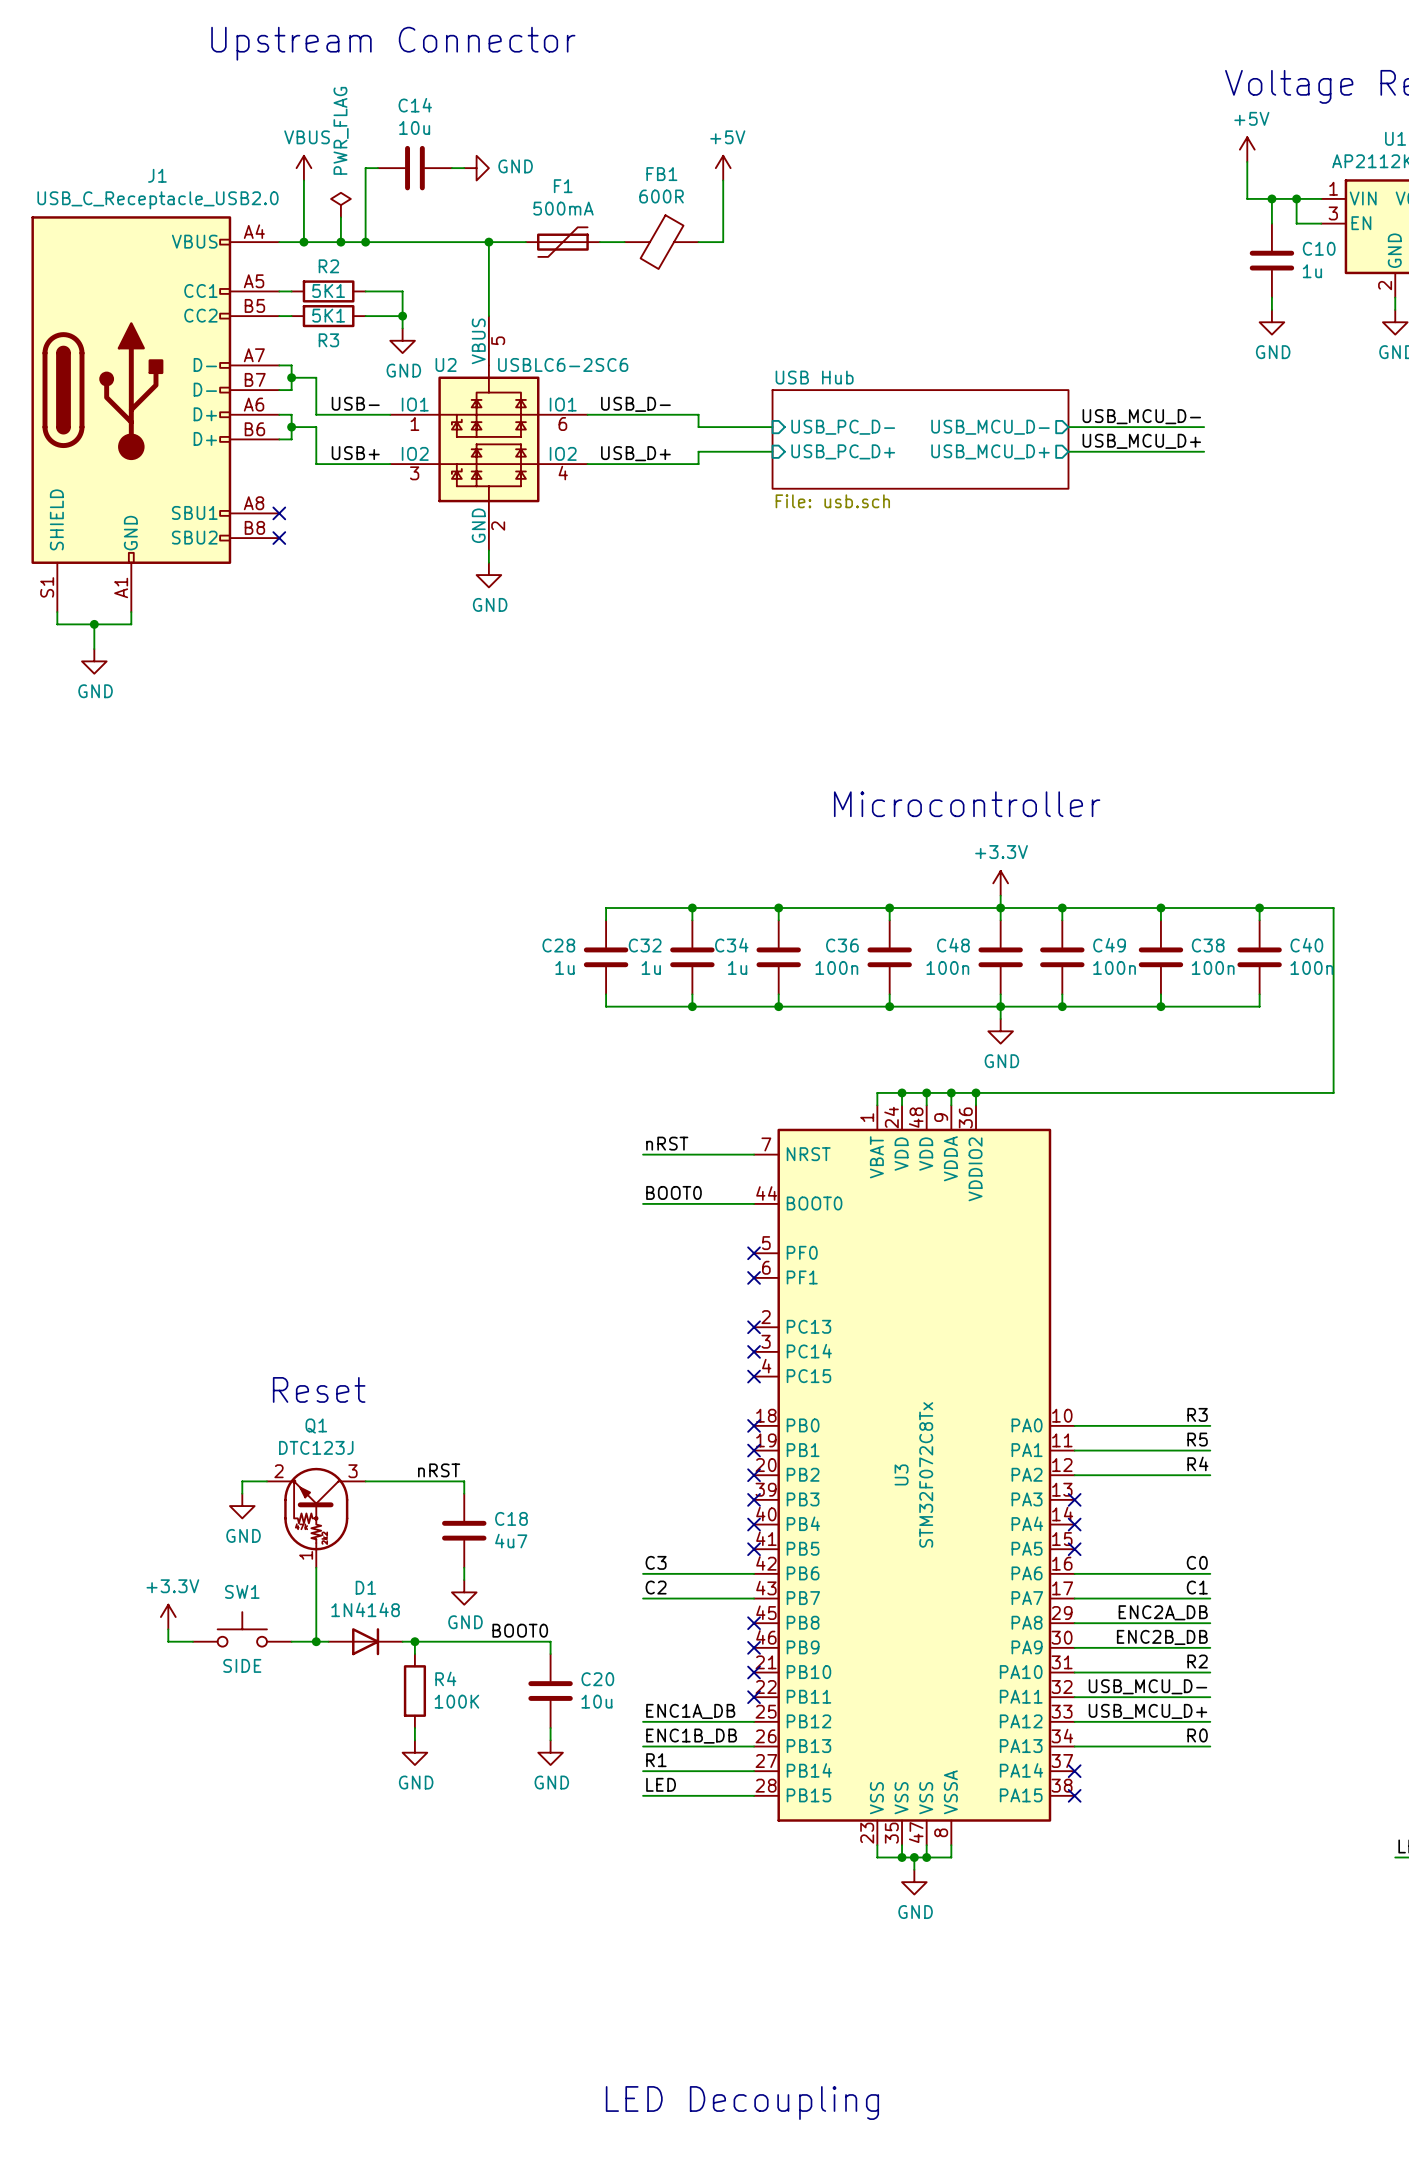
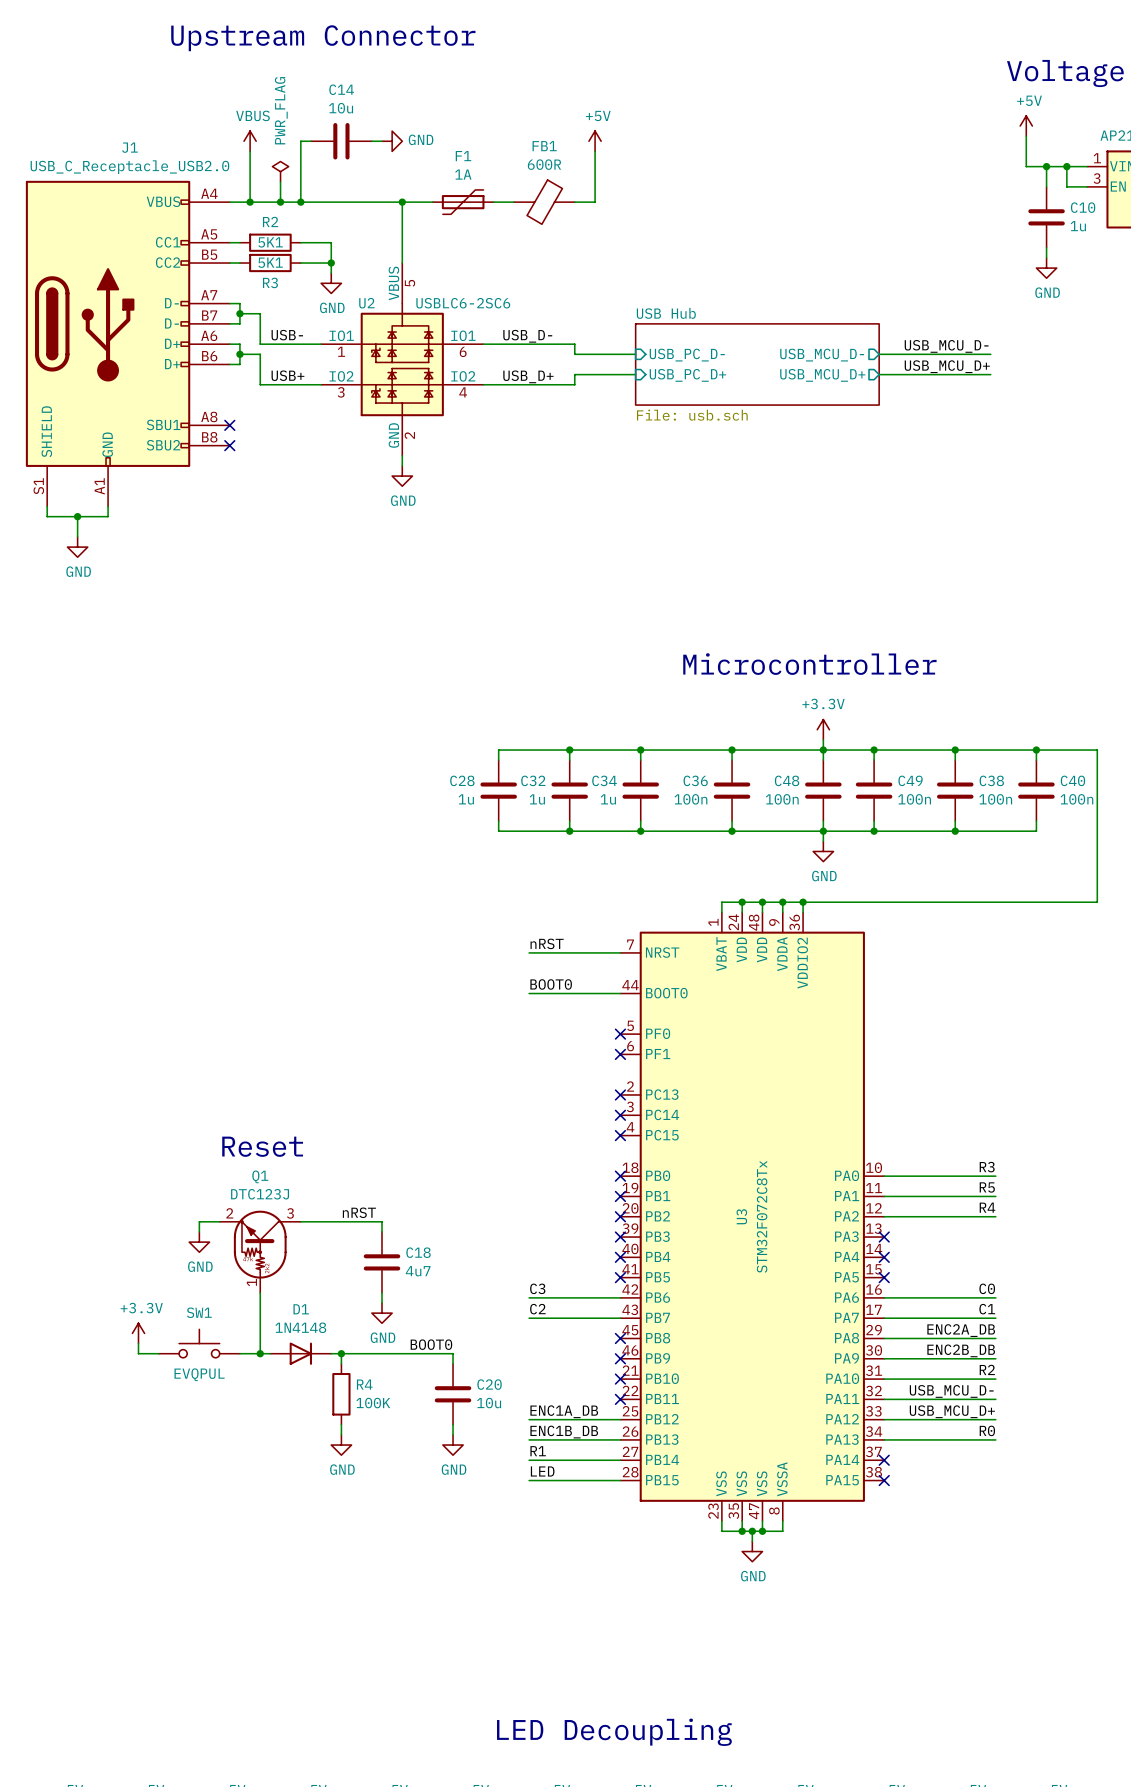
F1 value: 500mA (563, 208) -> 1A (463, 174)
SW1 value: SIDE (242, 1665) -> EVQPUL (199, 1374)

